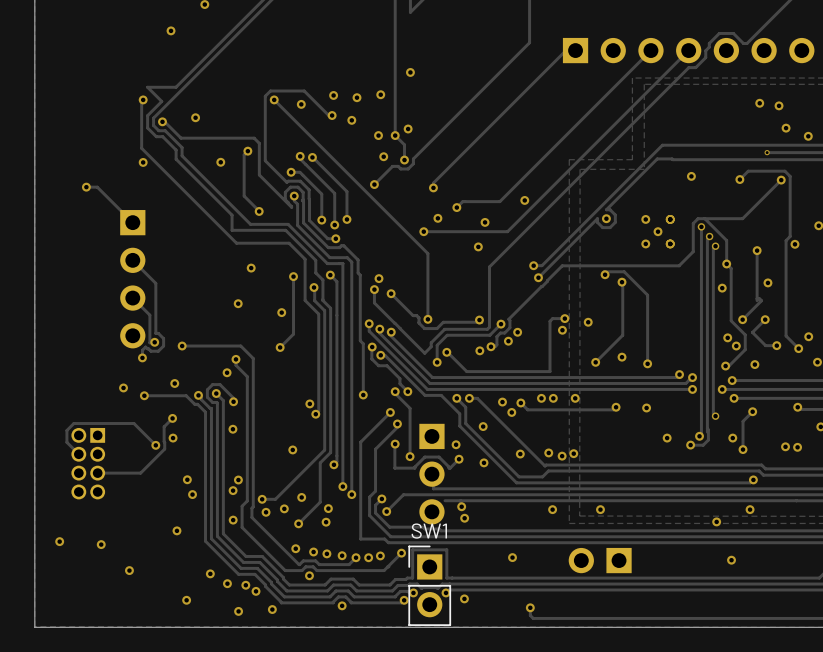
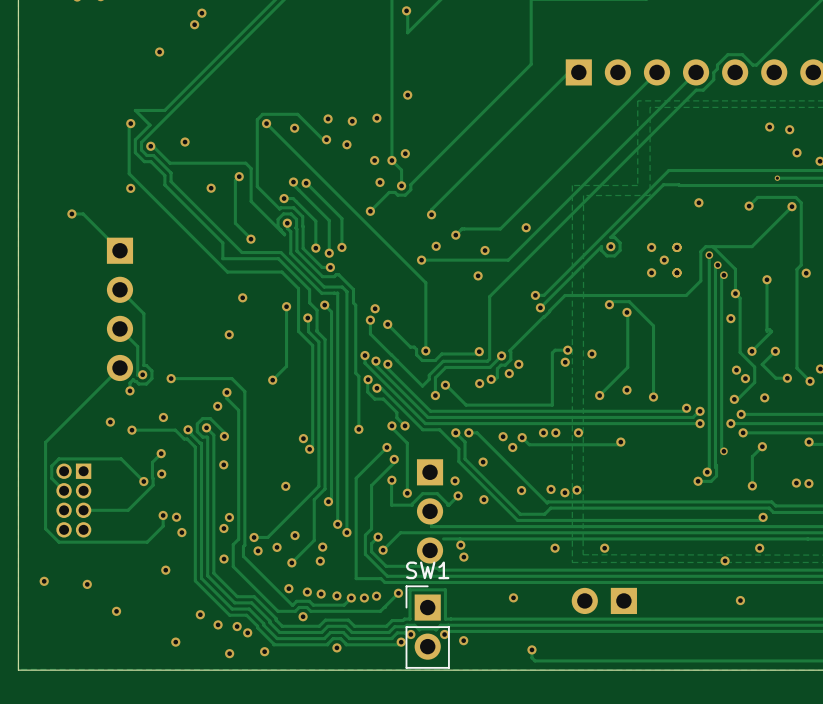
via: (767, 282) -> none
via: (281, 312) -> none
track: none -> (119, 367) (45, 442) (45, 528) (58, 542) (147, 542) (163, 526) (163, 515)
via: (646, 407) -> none
via: (667, 438) -> none
via: (732, 438) -> none
via: none -> (163, 515)

